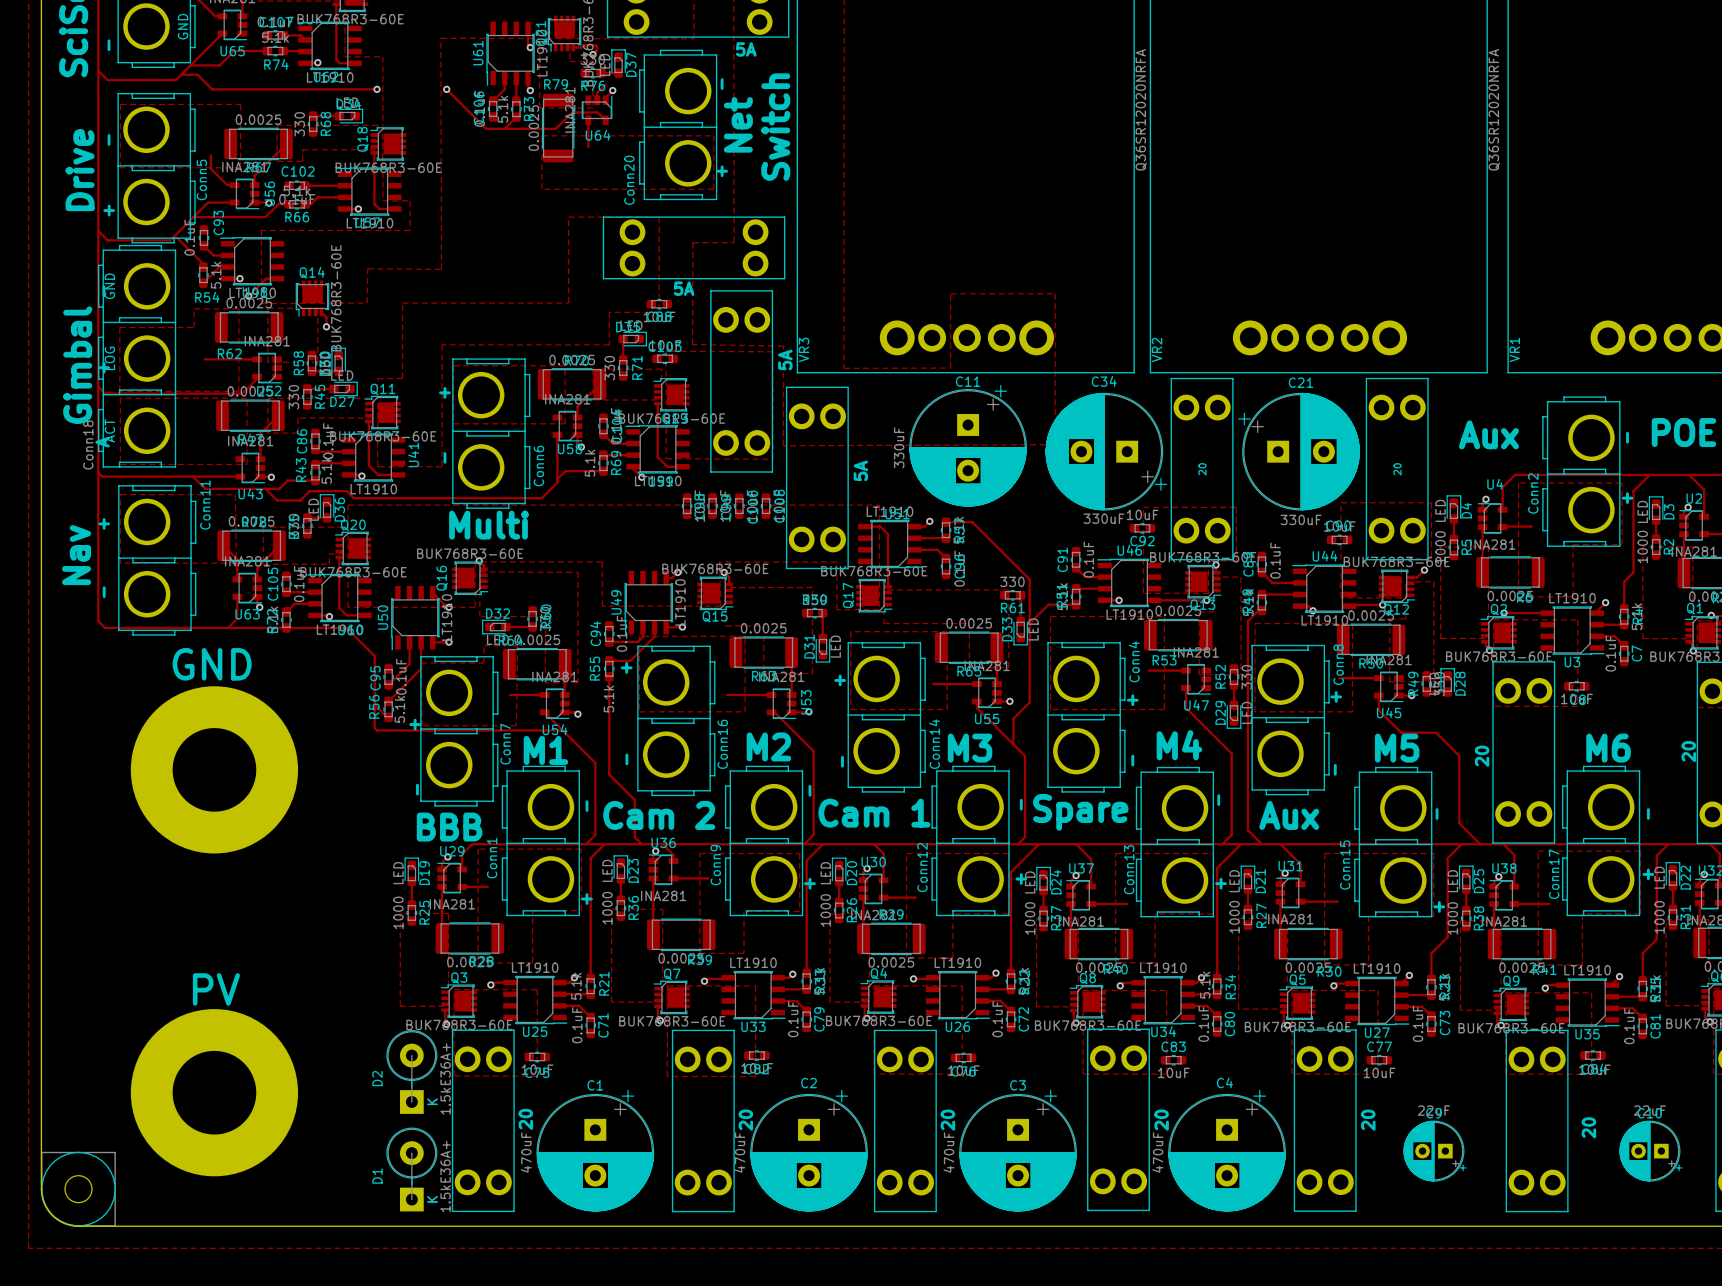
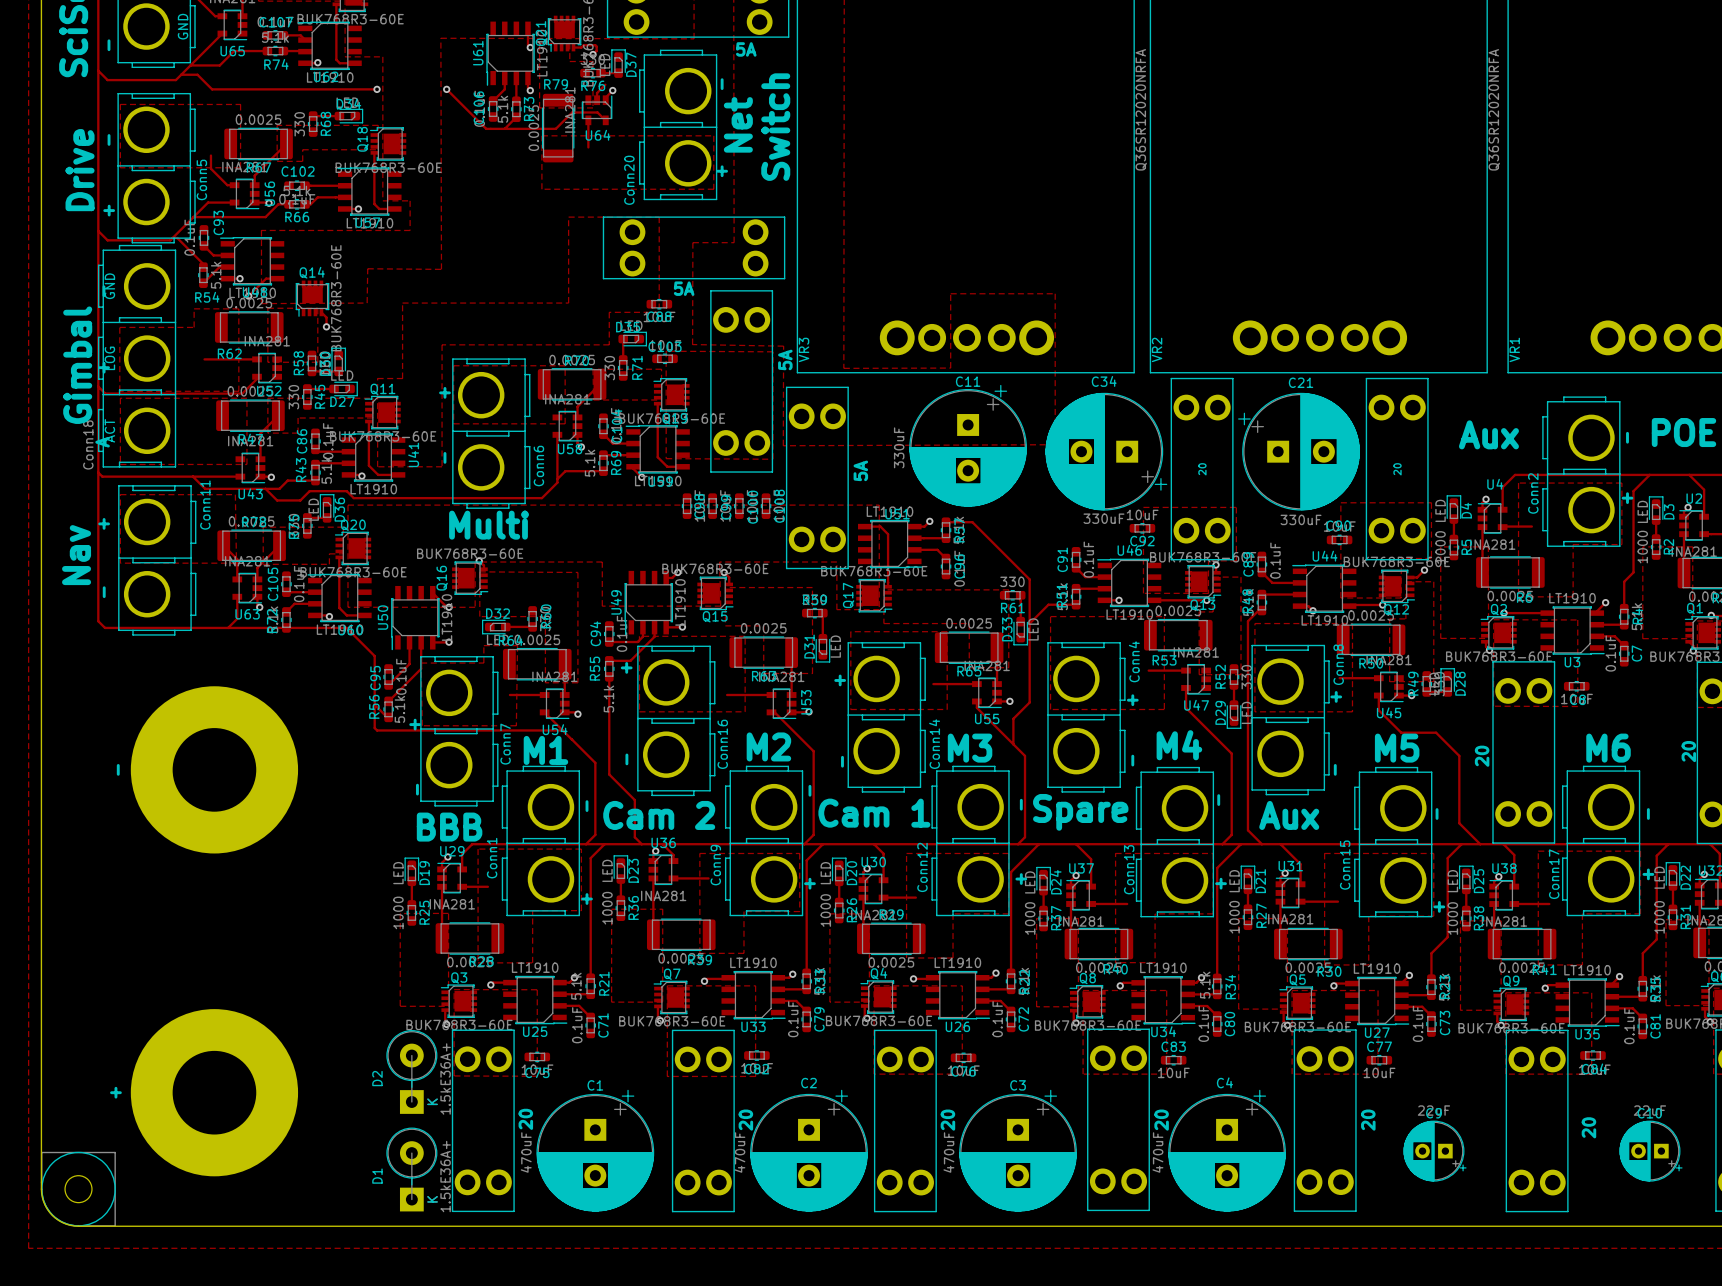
text: GND (212, 664) -> none
text: none -> - (118, 769)
text: PV (216, 989) -> none
text: none -> + (115, 1092)

